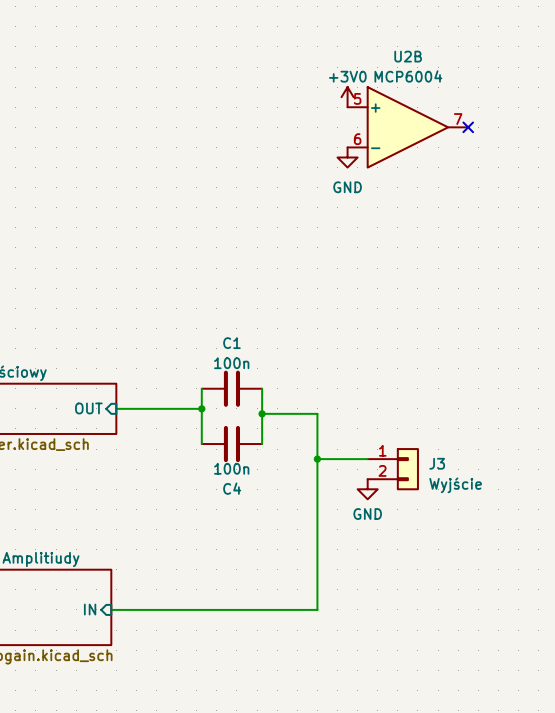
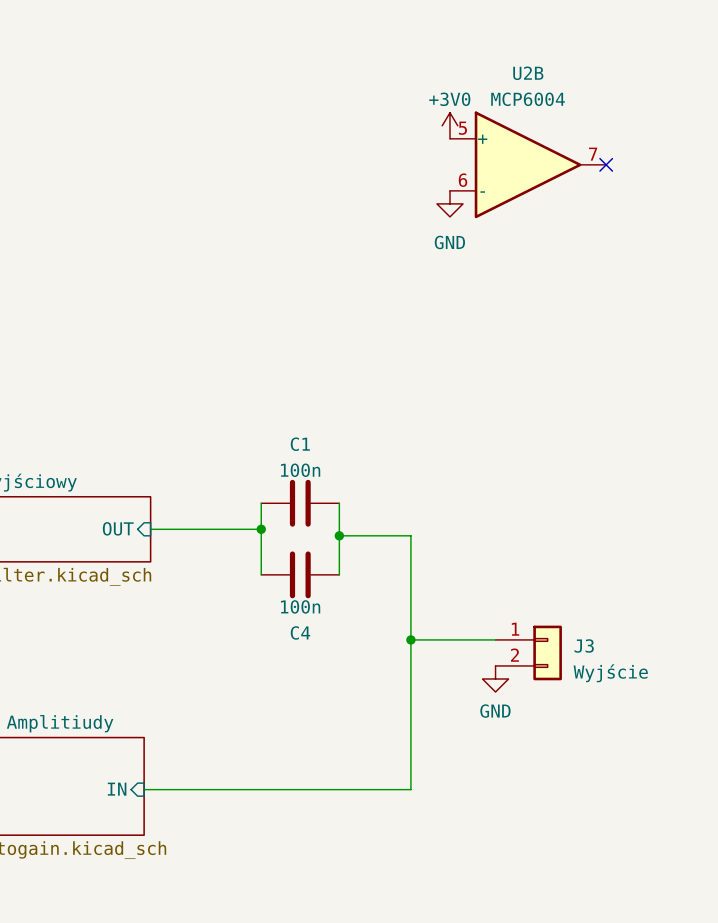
wire: (317, 459) (367, 459) -> none
junction position: (317, 459) -> (410, 639)
J3 position: (393, 469) -> (528, 652)
power symbol position: GND (367, 489) -> GND (495, 678)
wire: none -> (410, 639) (495, 639)

